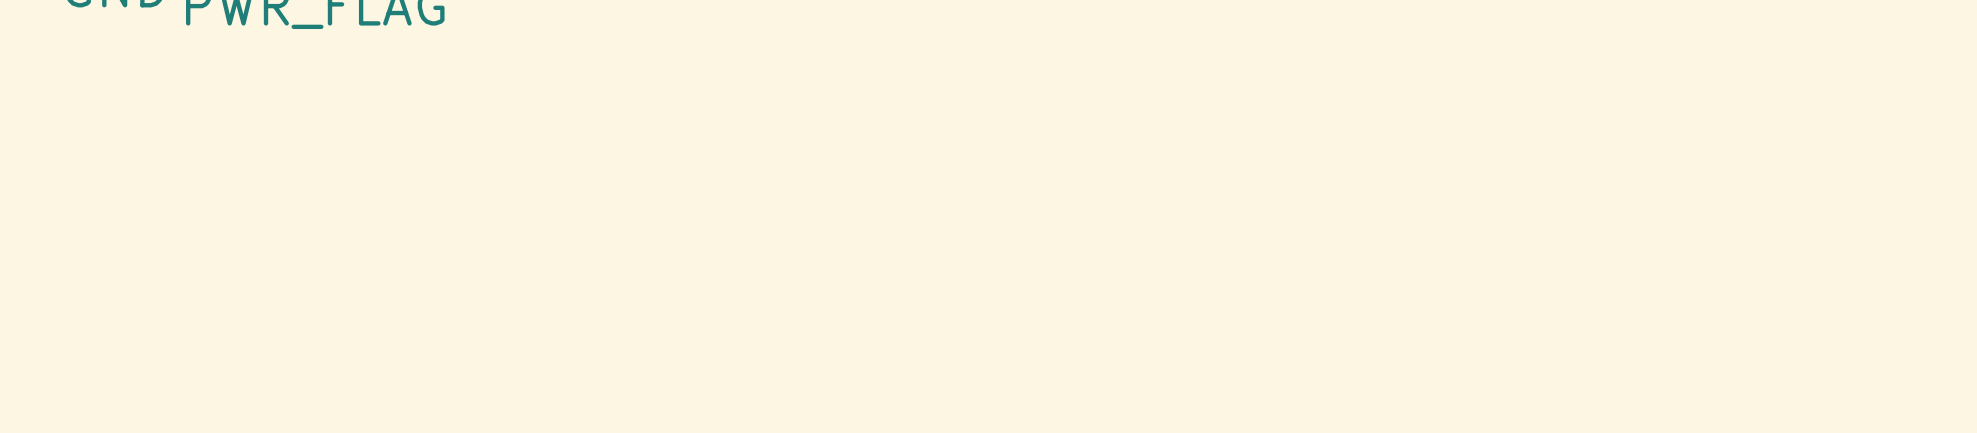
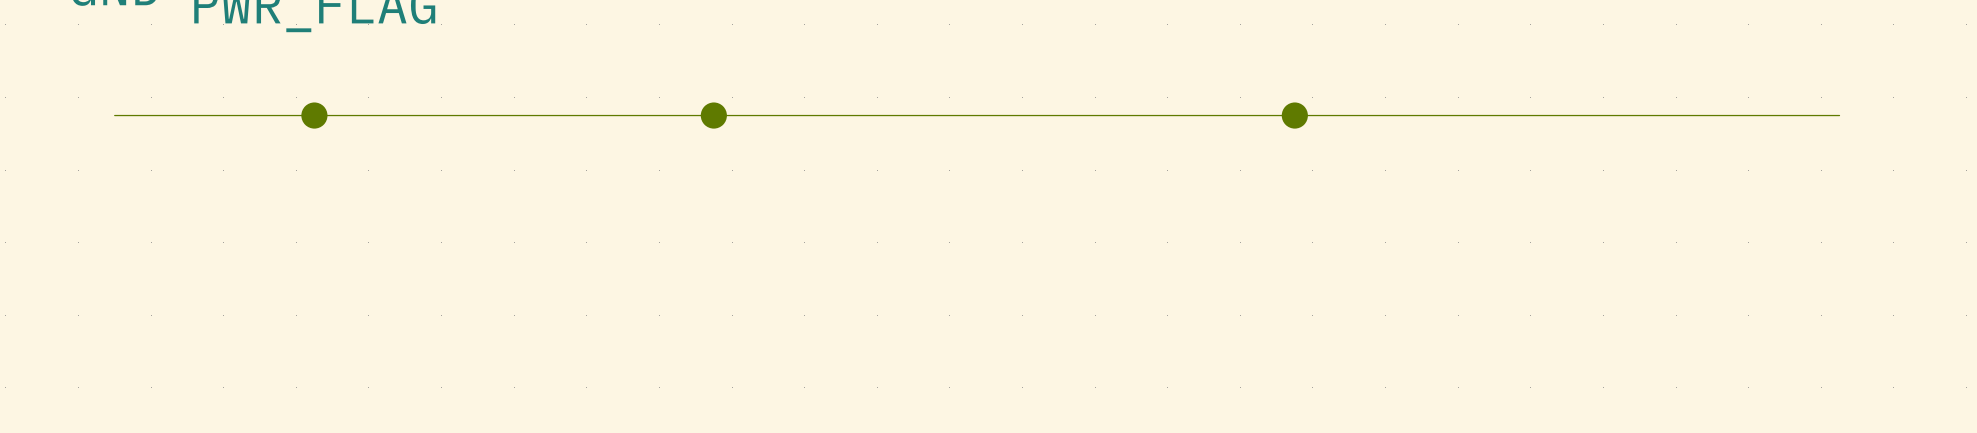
wire: none -> (114, 115) (1839, 115)
junction: none -> (314, 115)
junction: none -> (713, 115)
junction: none -> (1294, 115)

